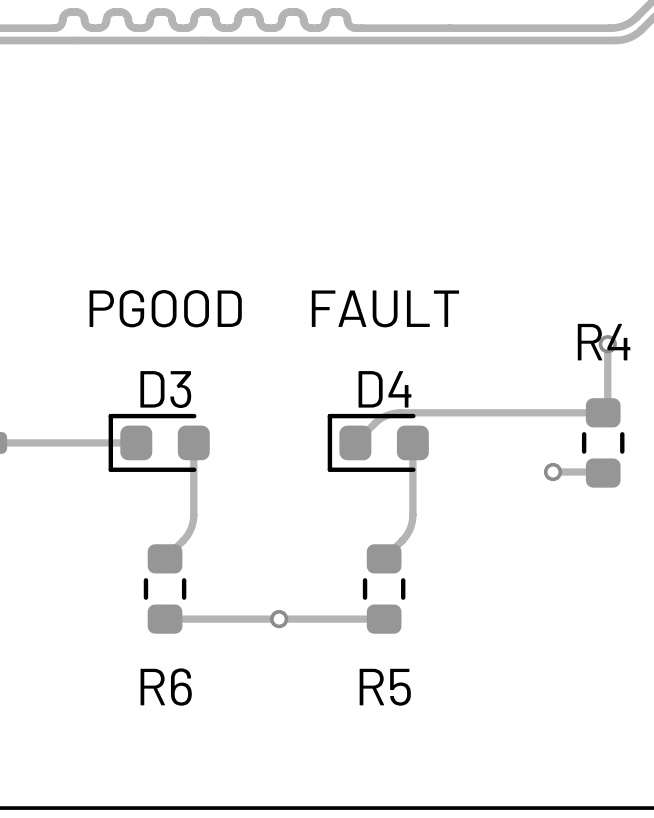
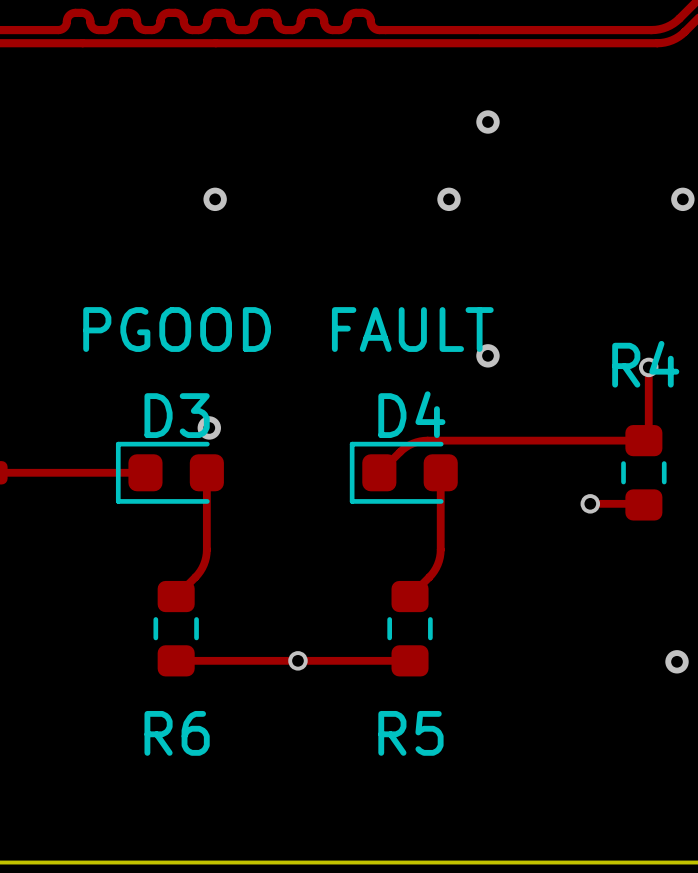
via: none -> (487, 122)
via: none -> (215, 199)
via: none -> (449, 199)
via: none -> (682, 199)
via: none -> (487, 355)
via: none -> (209, 427)
via: none -> (677, 661)

